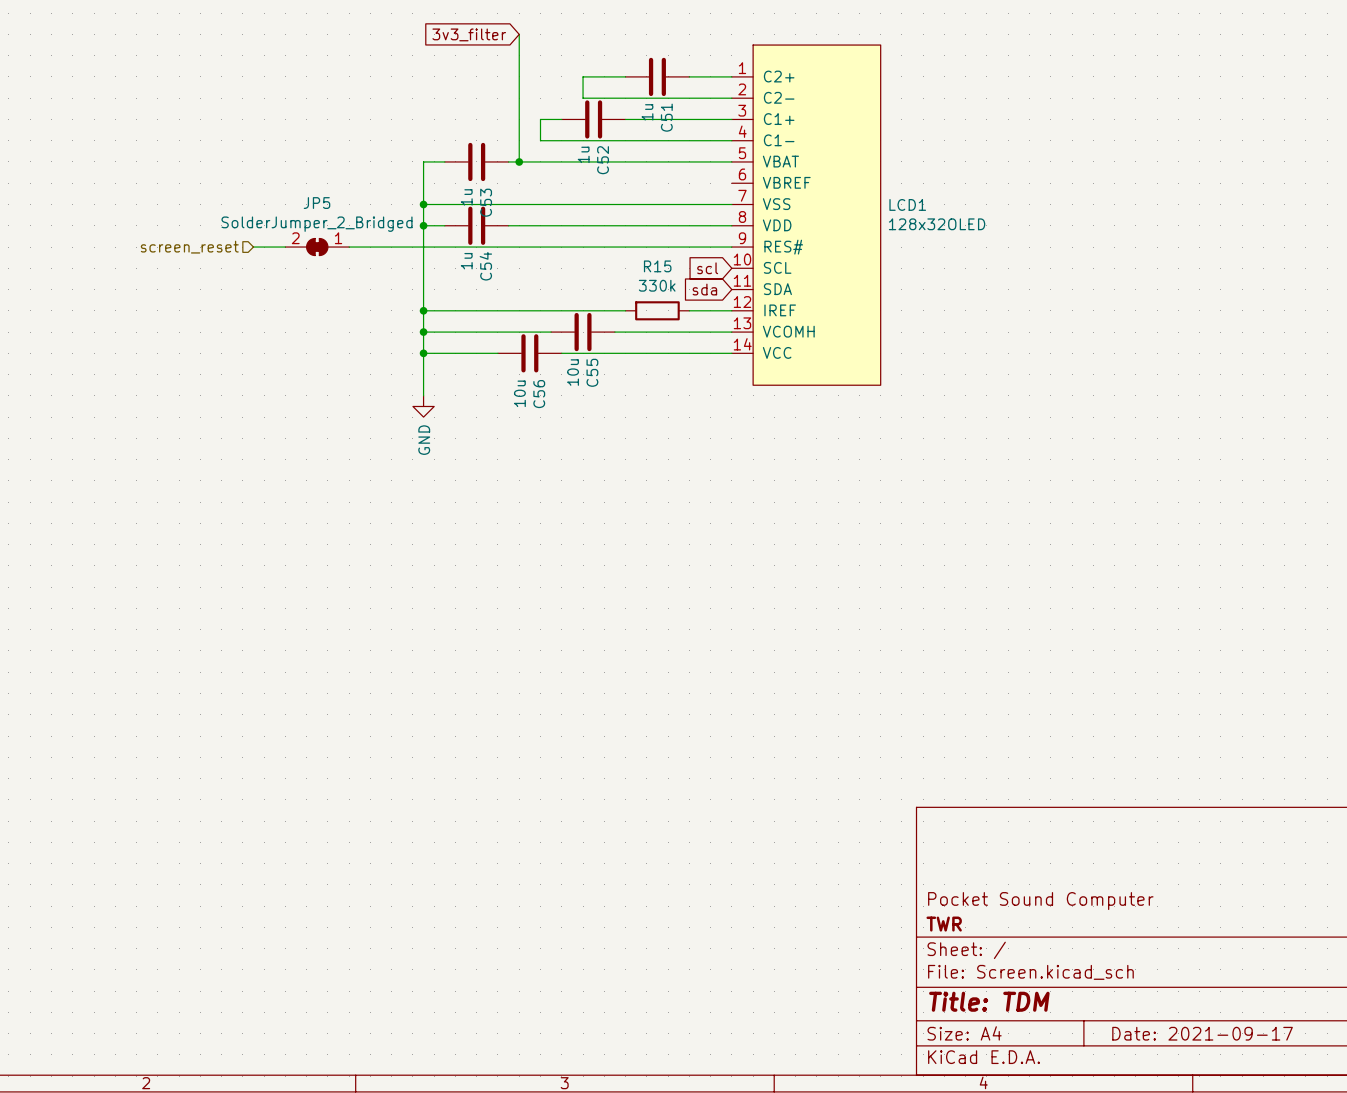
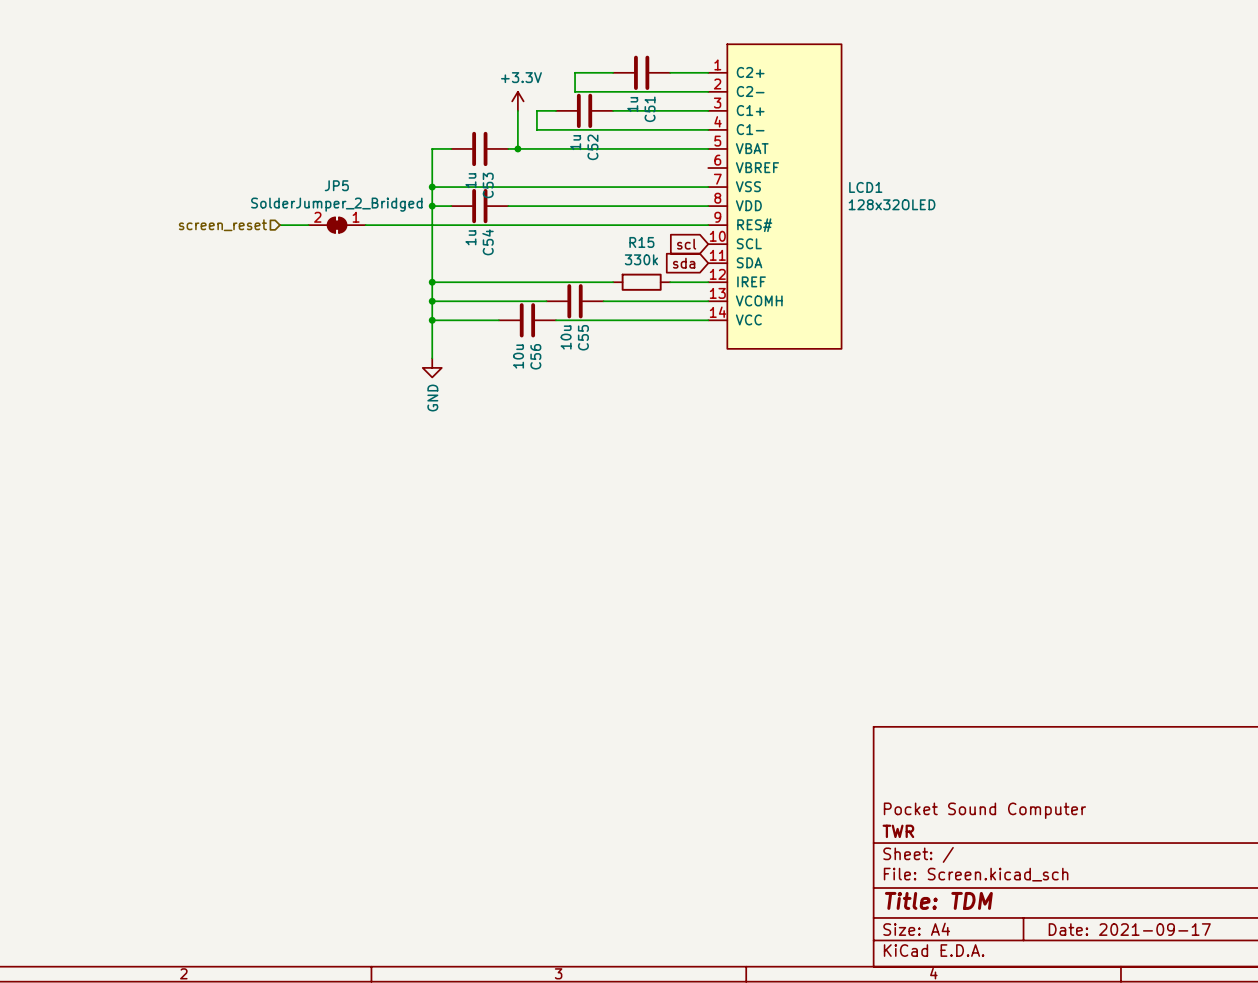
global label: 3v3_filter (469, 34) -> none
wire: (519, 34) (519, 119) -> none
power symbol: none -> +3.3V (517, 101)

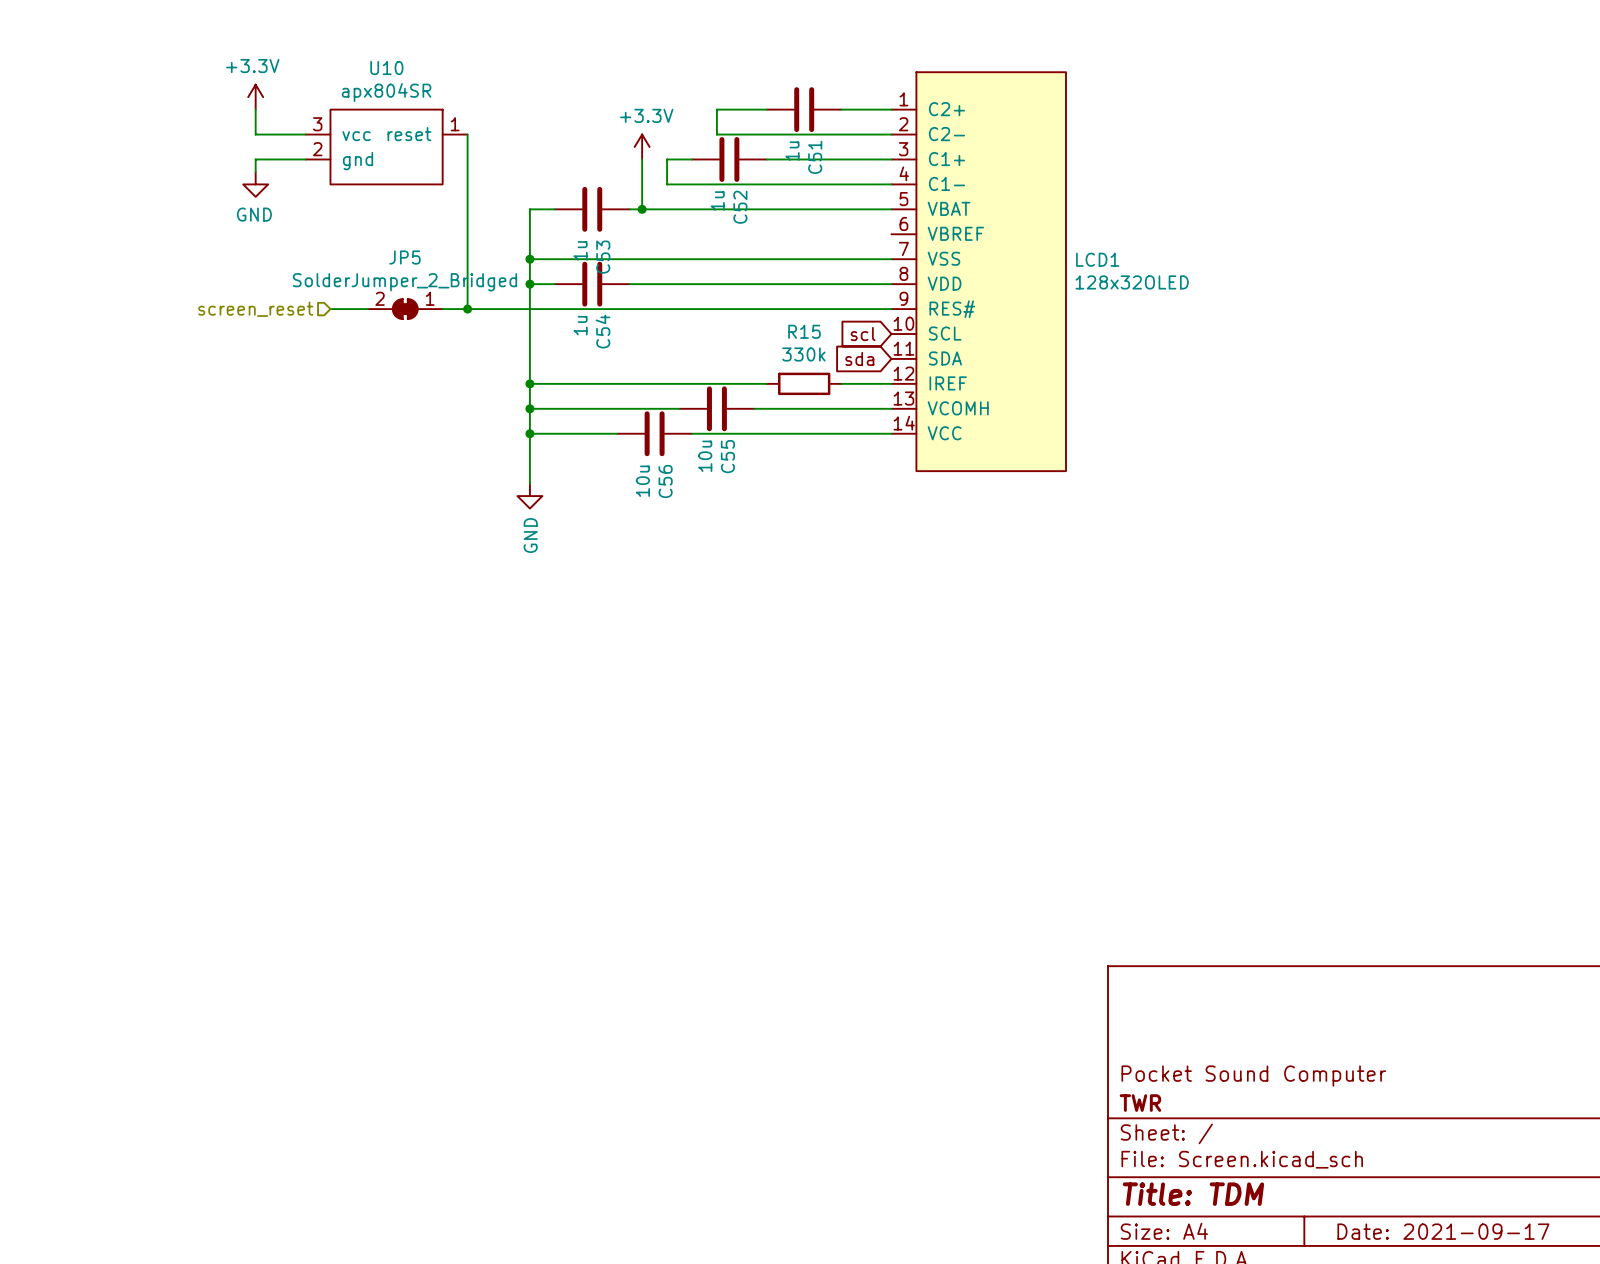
power symbol: none -> +3.3V (255, 97)
wire: none -> (255, 109) (255, 134) (305, 134)
wire: none -> (467, 134) (467, 309)
U10: none -> apx804SR (386, 147)
wire: none -> (305, 159) (255, 159) (255, 171)
power symbol: none -> GND (255, 184)
junction: none -> (467, 309)

